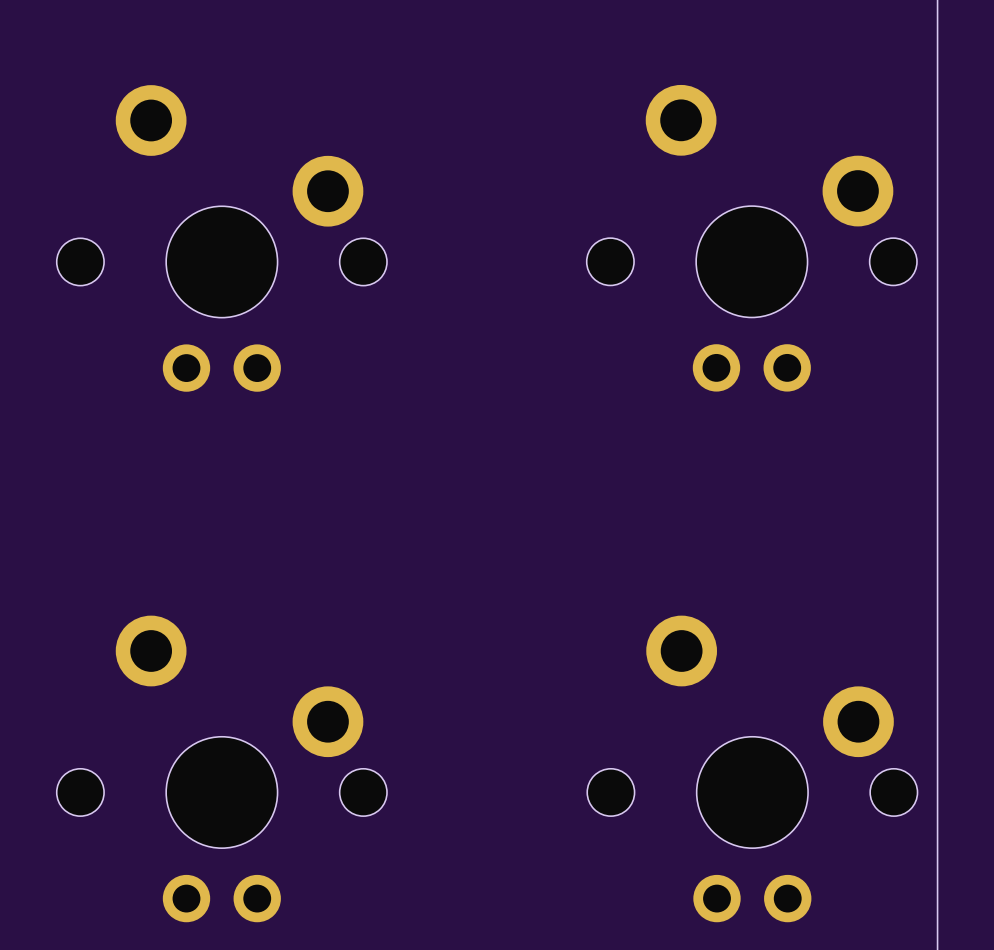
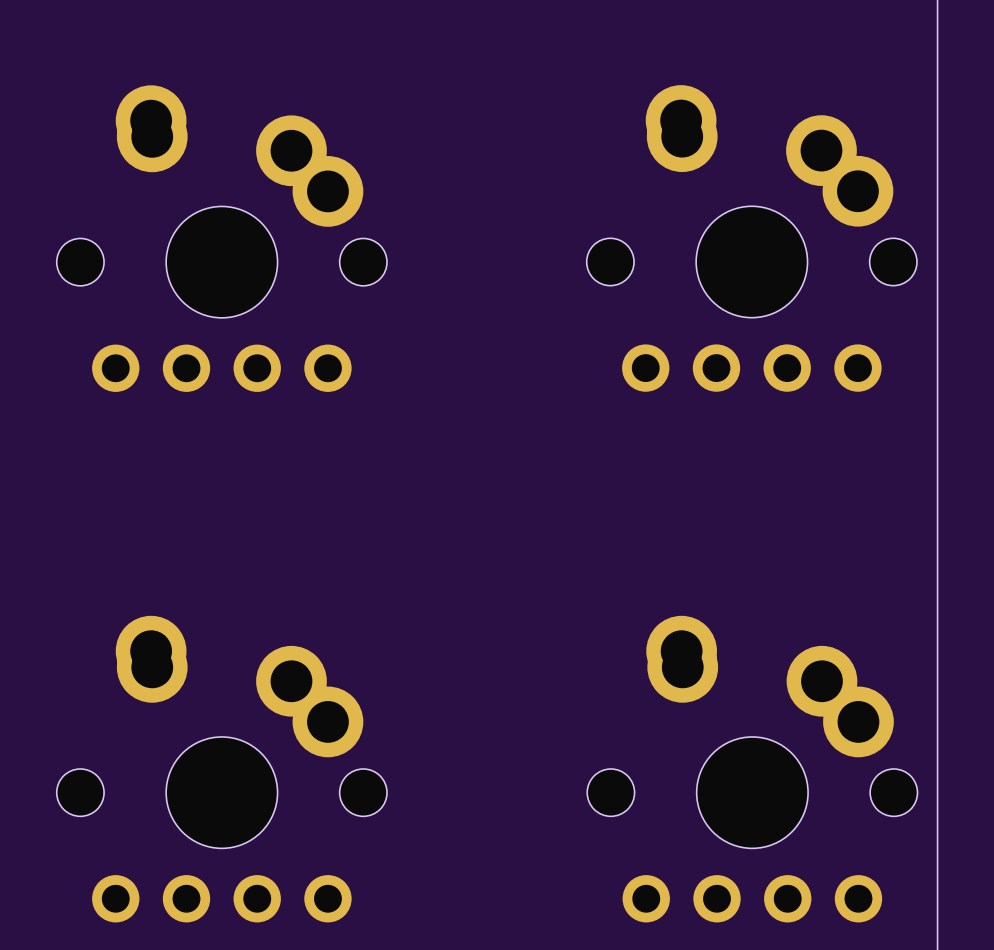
part footprint: [586, 84, 917, 392] -> [586, 85, 917, 392]
part footprint: [56, 85, 388, 392] -> [56, 85, 388, 392]
part footprint: [56, 615, 388, 923] -> [56, 615, 388, 923]
part footprint: [587, 615, 918, 923] -> [587, 615, 918, 923]

